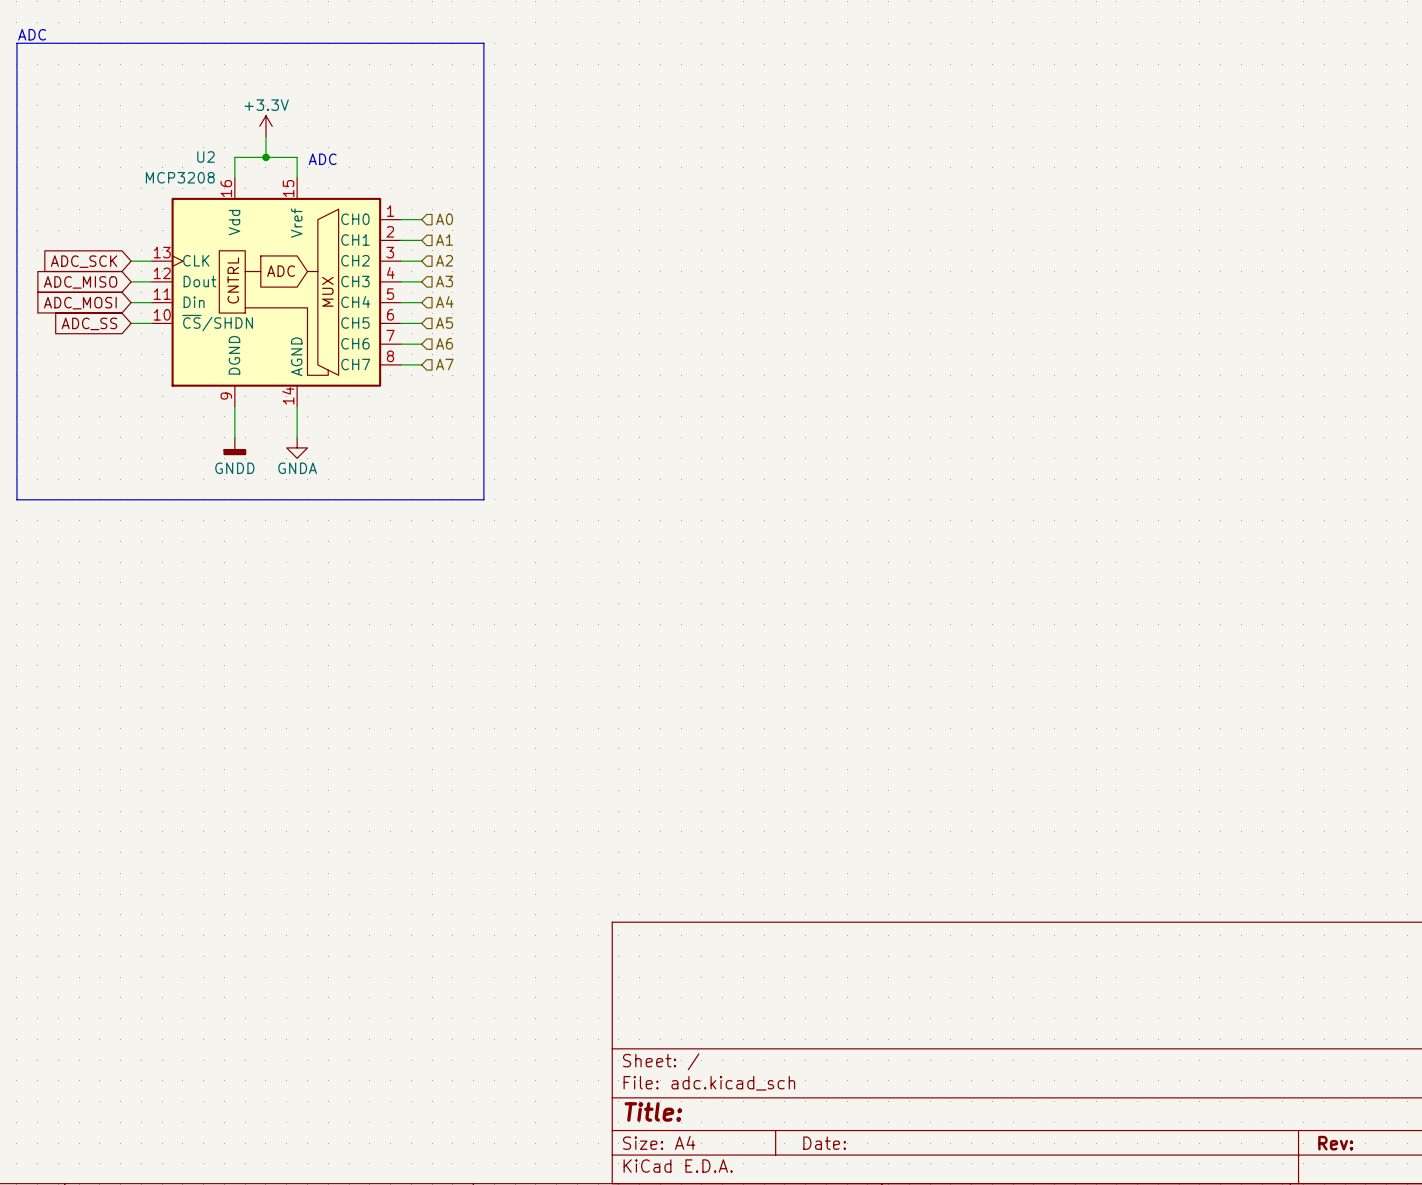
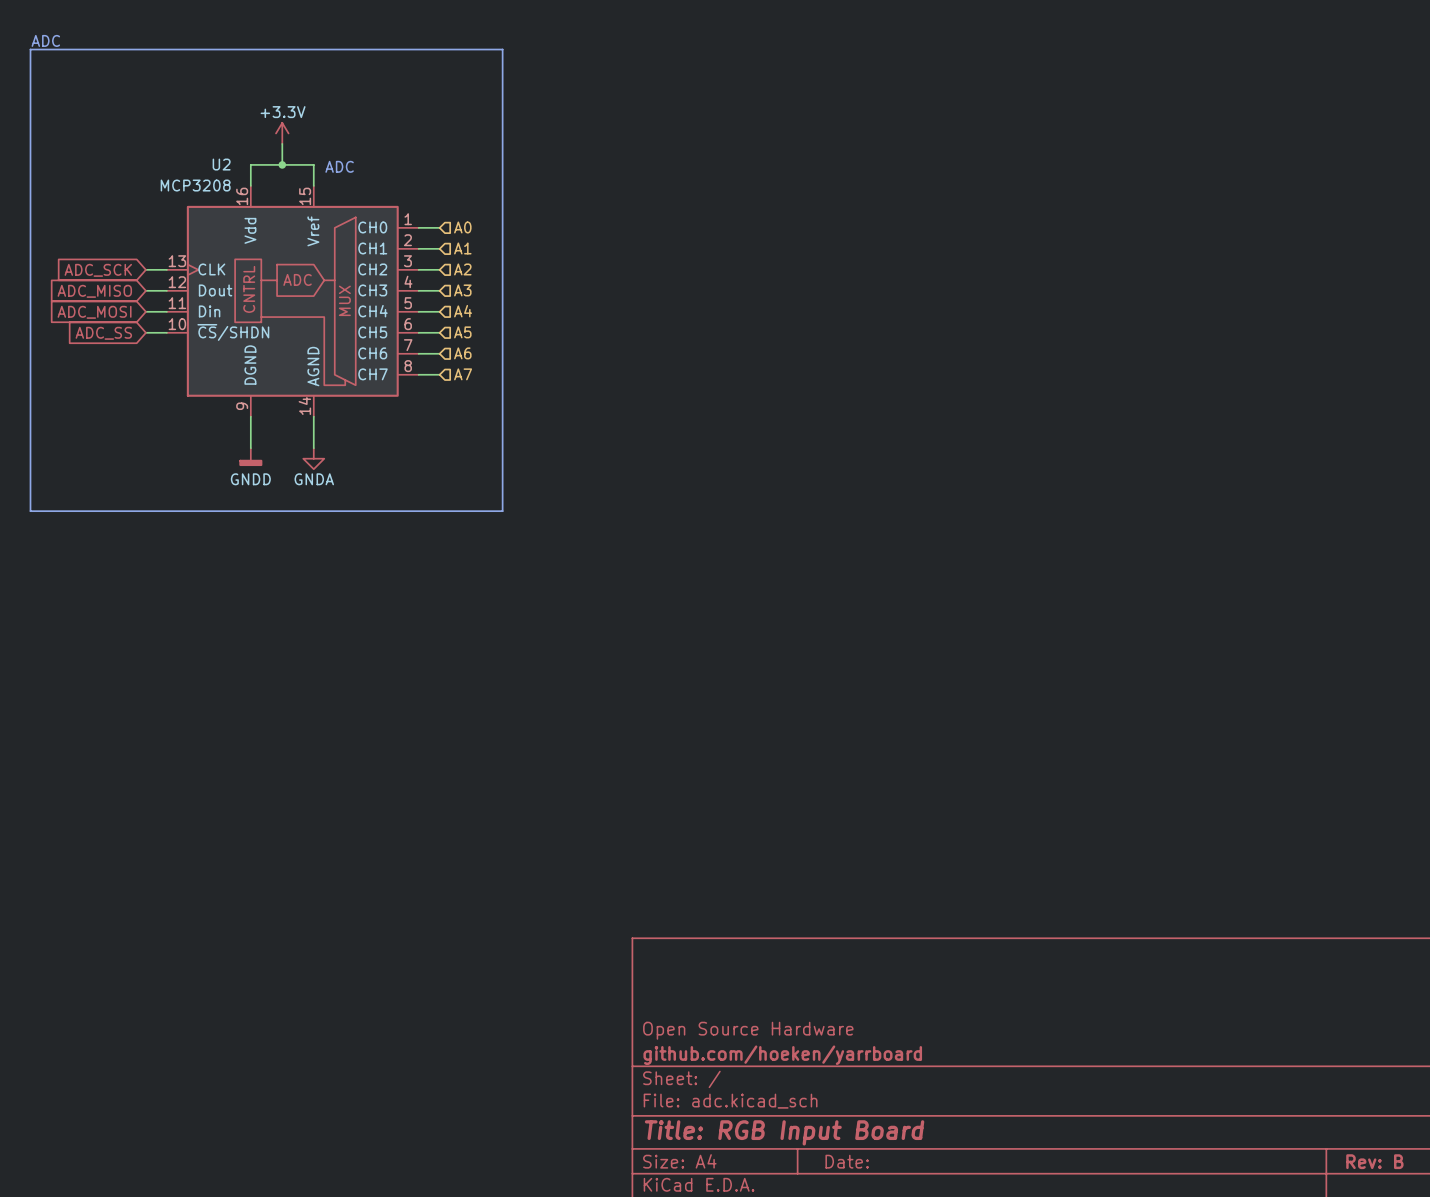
title block: none -> Open Source Hardware (748, 1030)
title block: none -> github.com/hoeken/yarrboard (782, 1055)
title block: Title: (653, 1111) -> Title: RGB Input Board (784, 1132)
title block: Rev: (1335, 1143) -> Rev: B (1374, 1161)

